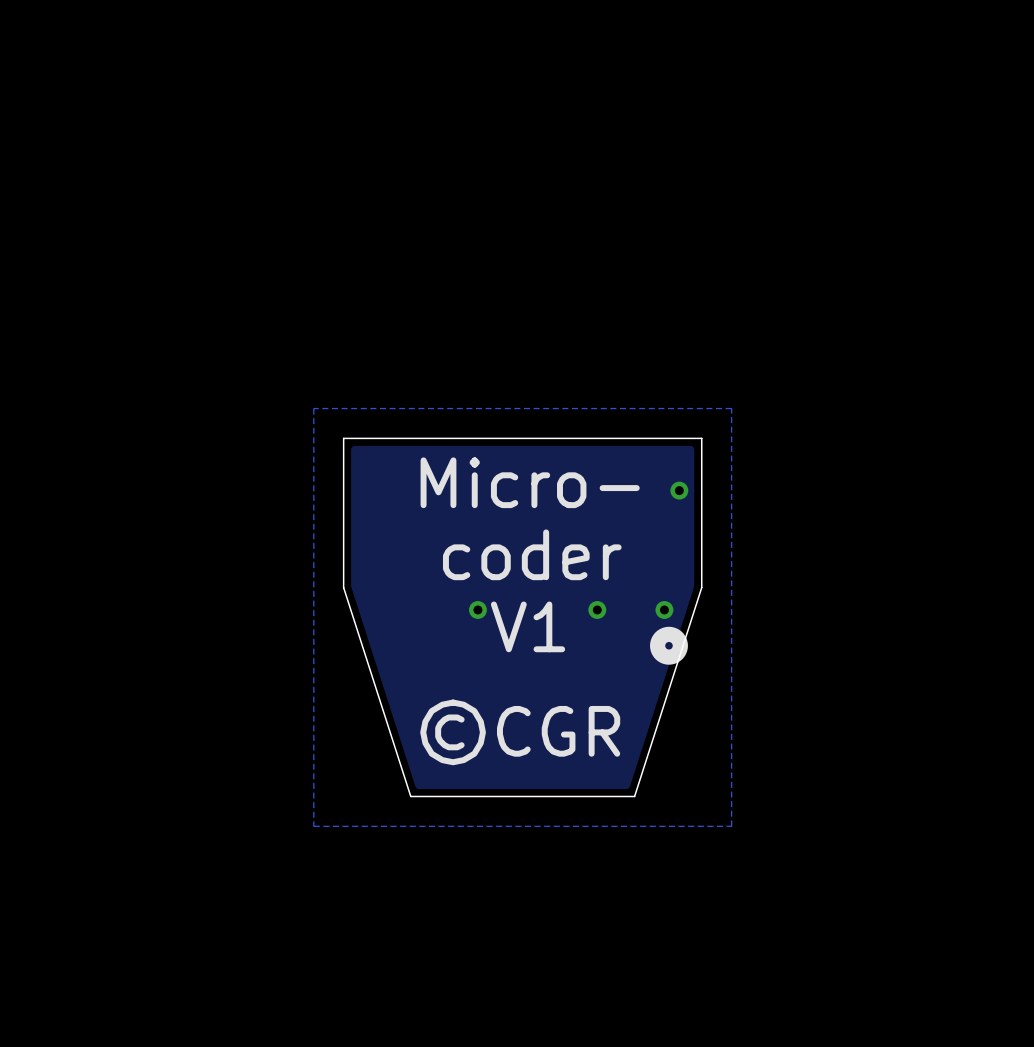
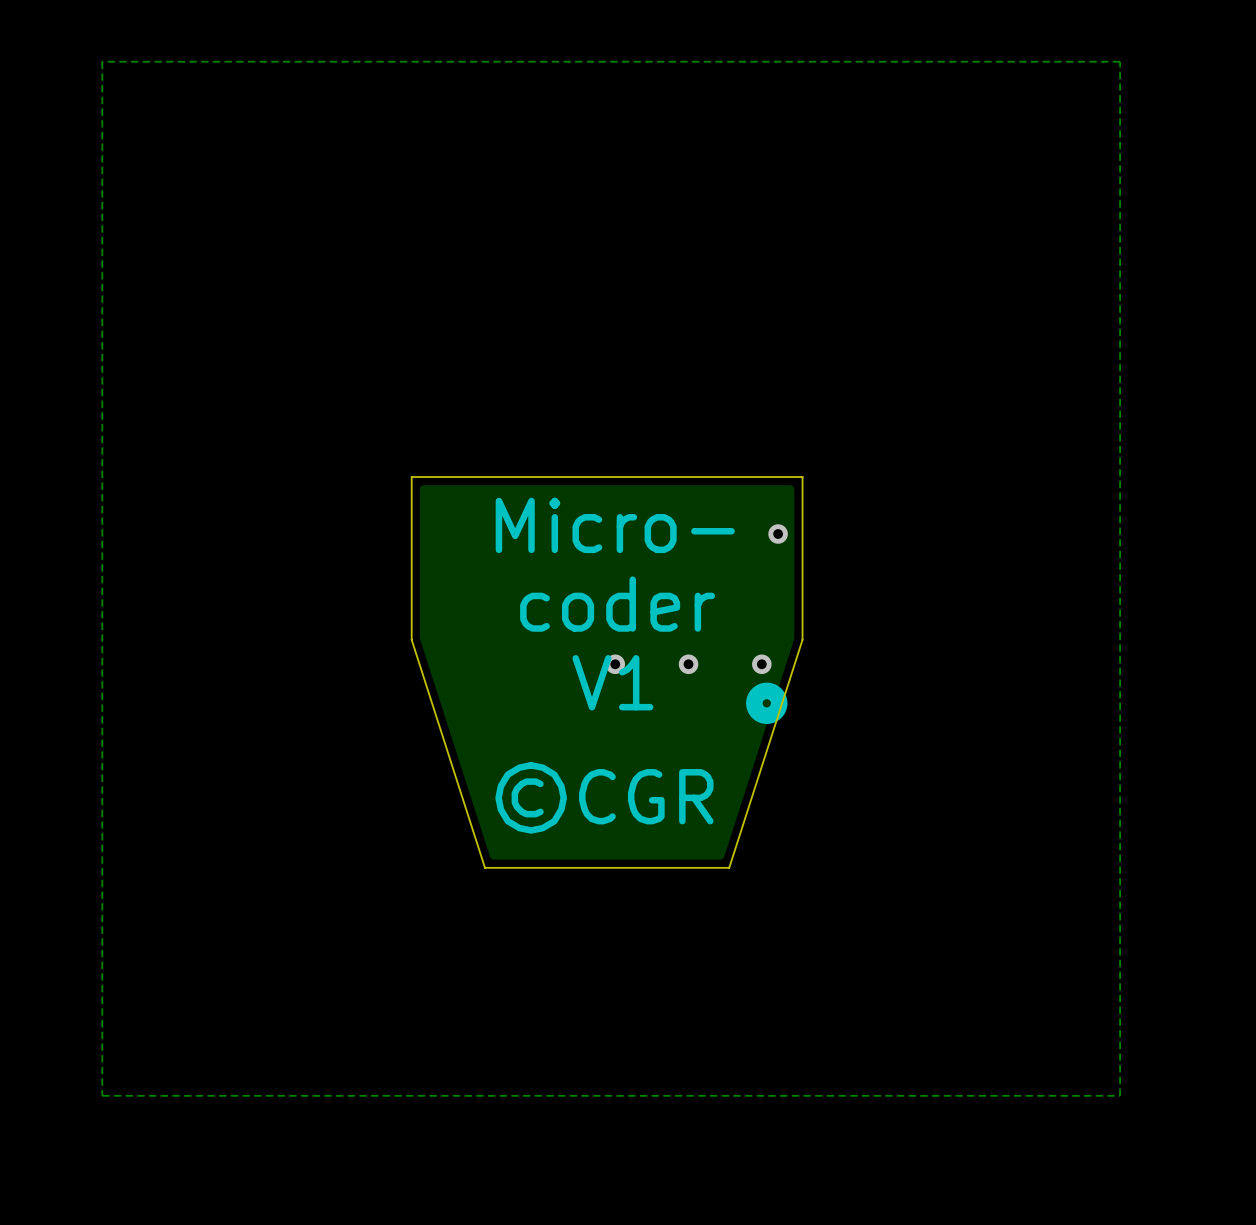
zone outline: none -> (1120, 61) (102, 61) (102, 1095) (1120, 1095) (1120, 61)
zone outline: (731, 408) (313, 408) (313, 826) (731, 826) (731, 408) -> none
via position: (477, 609) -> (615, 664)

